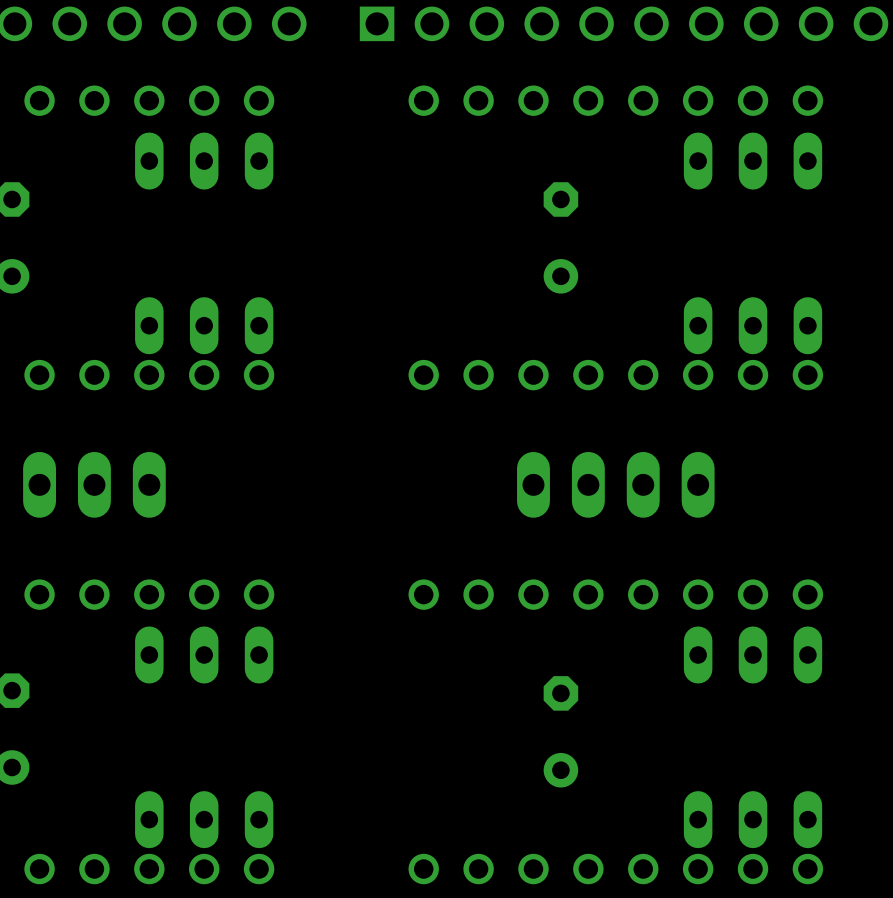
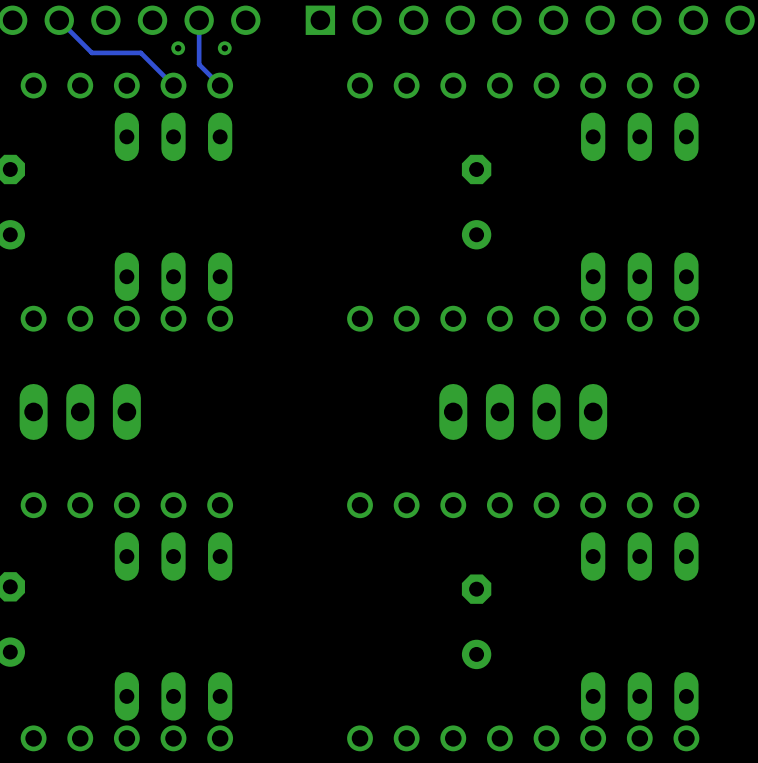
track: none -> (59, 20) (91, 52) (140, 52) (173, 85)
track: none -> (199, 20) (199, 64) (220, 85)
via: none -> (178, 48)
via: none -> (224, 48)

